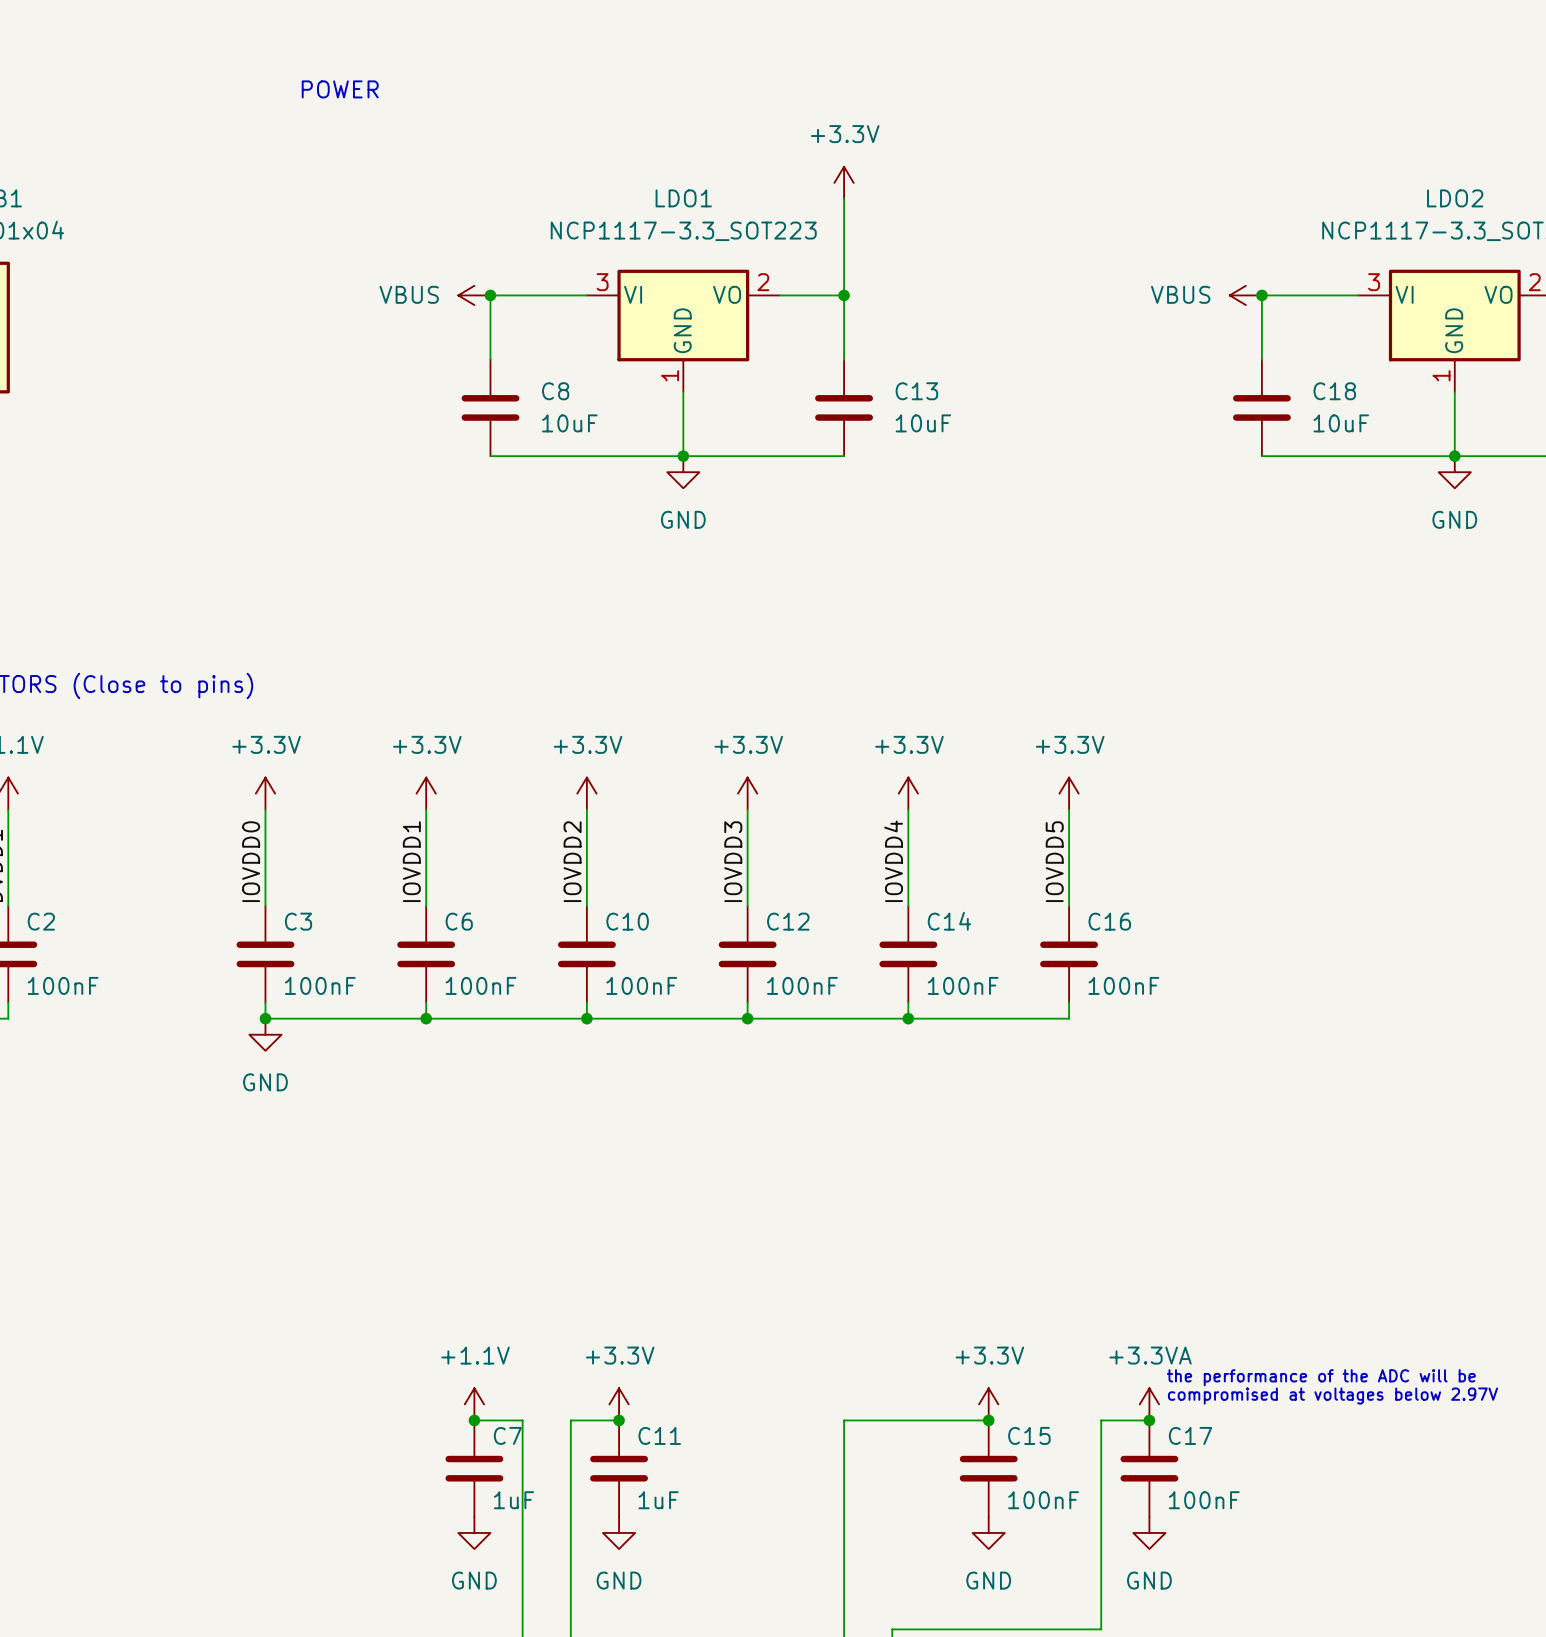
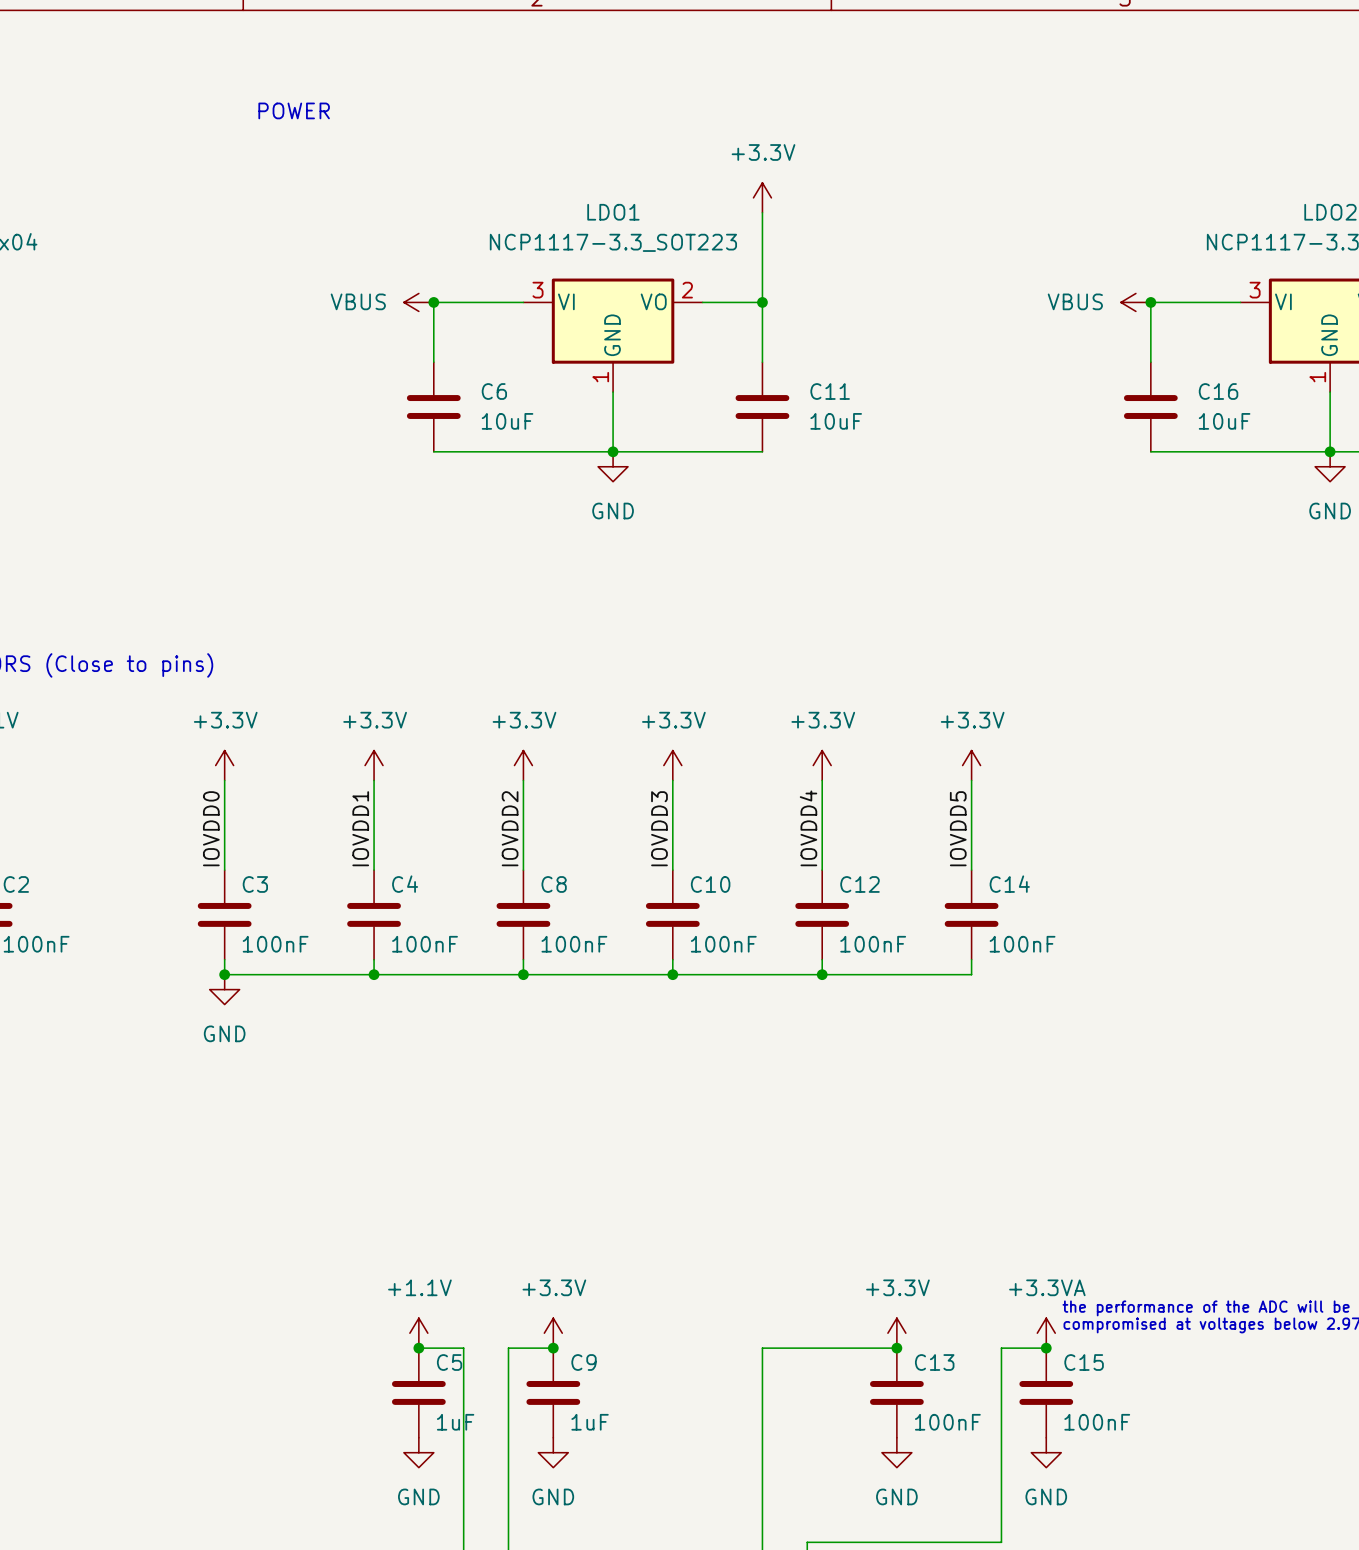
C8 name: C8 (555, 391) -> C6 (494, 391)
C13 name: C13 (916, 391) -> C11 (830, 391)
C18 name: C18 (1334, 391) -> C16 (1218, 391)
C6 name: C6 (459, 921) -> C4 (405, 884)
C10 name: C10 (627, 921) -> C8 (554, 884)
C12 name: C12 (788, 921) -> C10 (710, 884)
C14 name: C14 (949, 921) -> C12 (860, 884)
C16 name: C16 (1109, 921) -> C14 (1009, 884)
C7 name: C7 (507, 1435) -> C5 (449, 1362)
C11 name: C11 (659, 1435) -> C9 (584, 1362)
C15 name: C15 (1029, 1435) -> C13 (934, 1362)
C17 name: C17 (1190, 1435) -> C15 (1084, 1362)

